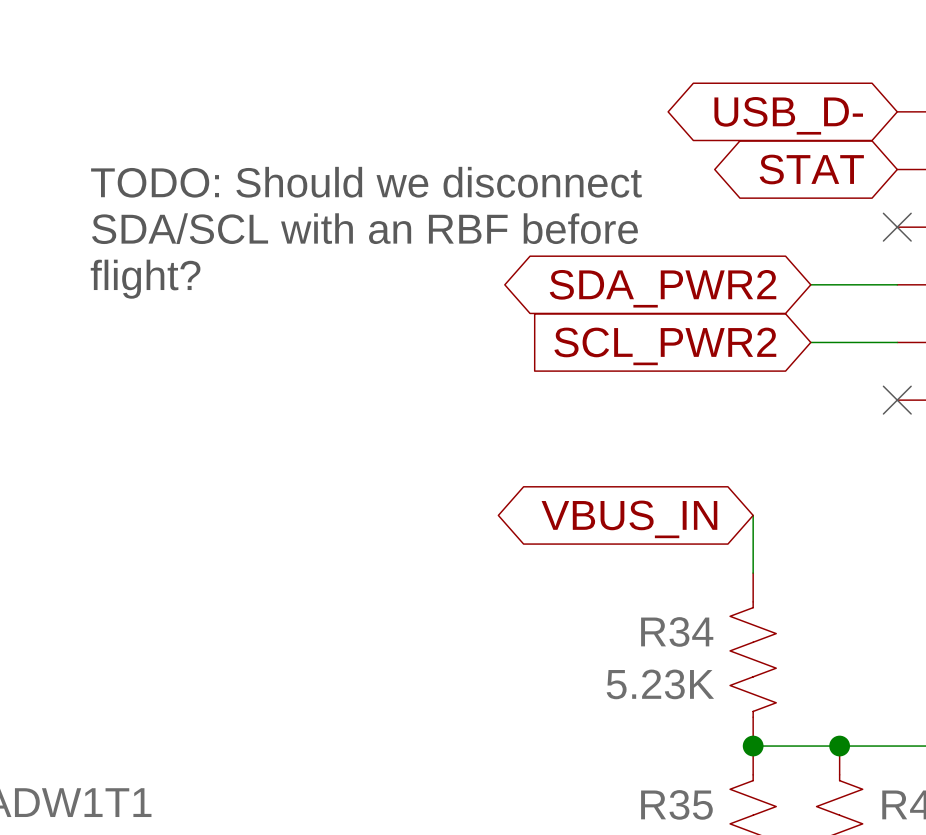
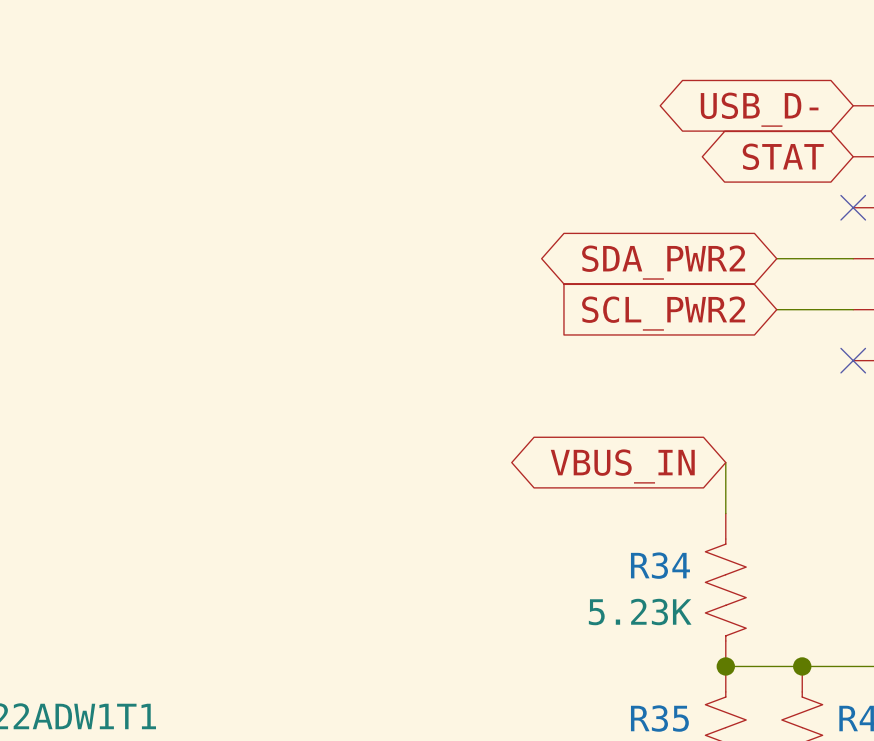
text: TODO: Should we disconnect (366, 182) -> none
text: SDA/SCL with an RBF before (364, 228) -> none
text: flight? (145, 279) -> none

